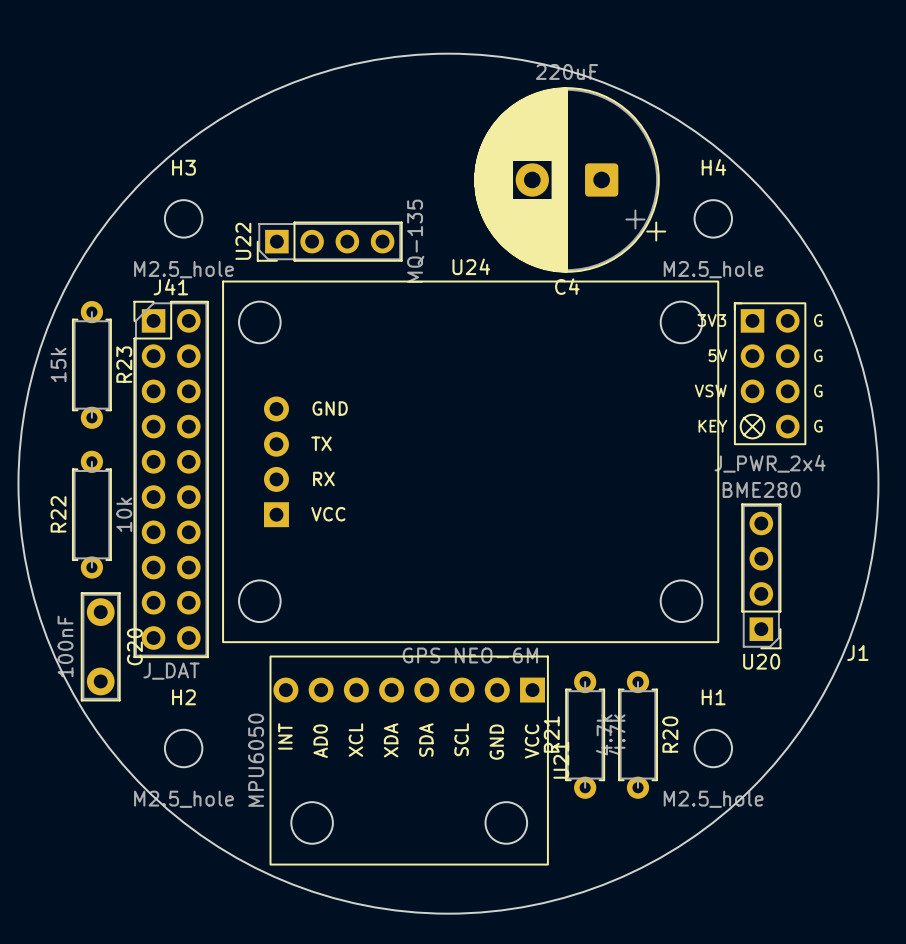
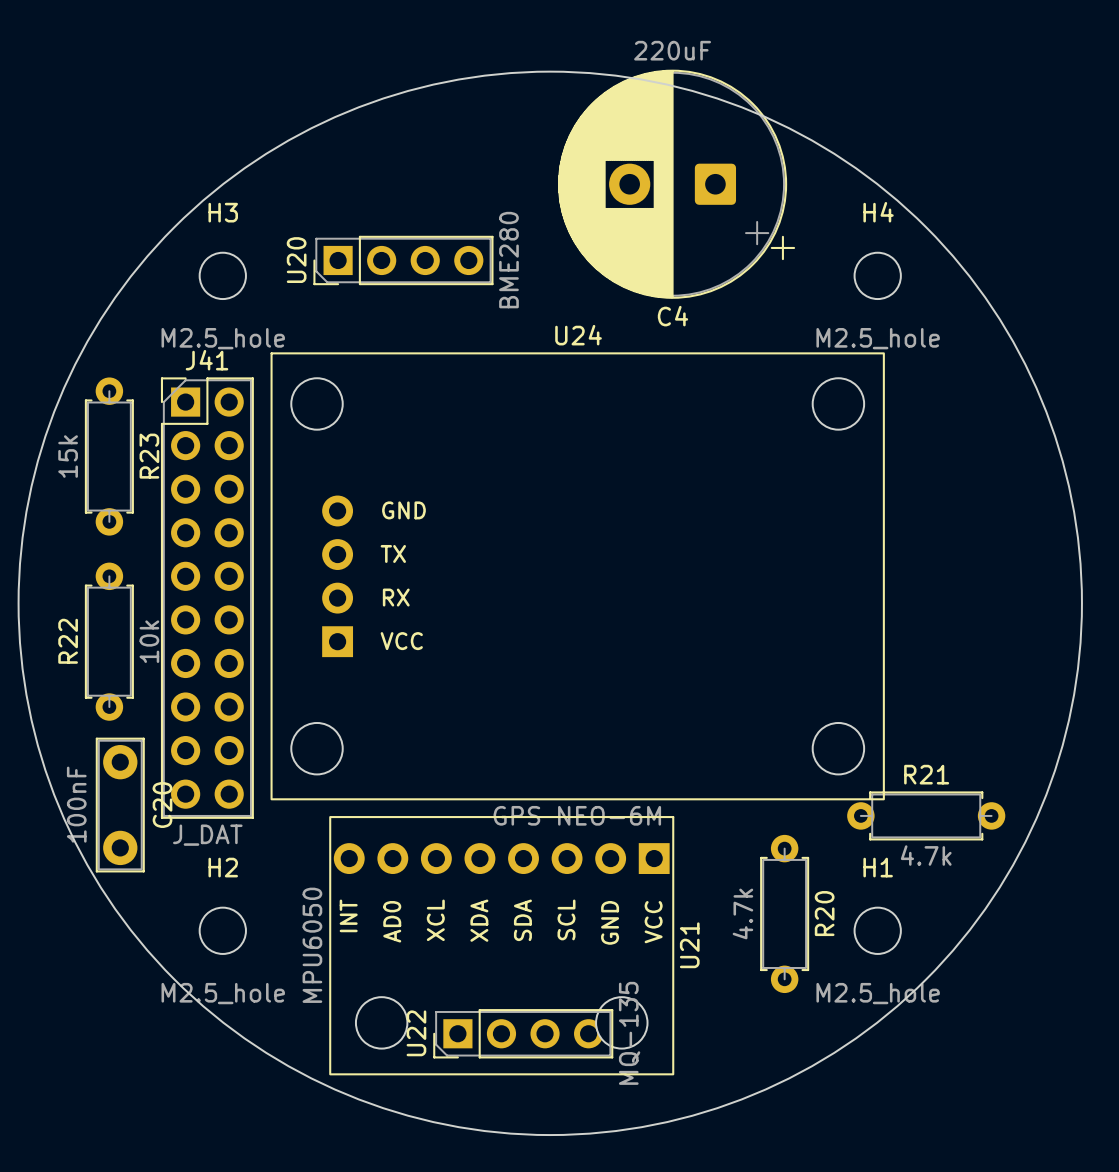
C4 position: (570, 179) -> (676, 184)
U22 position: (329, 241) -> (523, 1033)
J1: J_PWR_2x4 (770, 373) -> none
U20 rotation: 0° (761, 576) -> 90° clockwise (403, 260)
U20 position: (761, 576) -> (403, 260)
R21 rotation: 0° (585, 734) -> 90° clockwise (926, 815)
R21 position: (585, 734) -> (926, 815)

